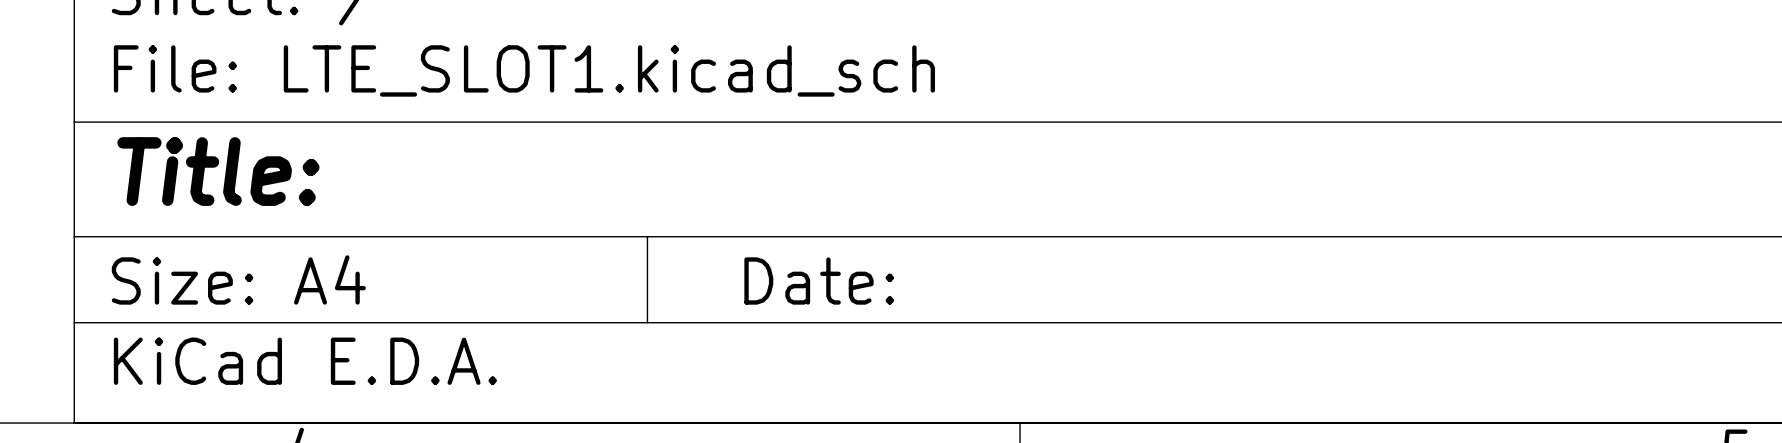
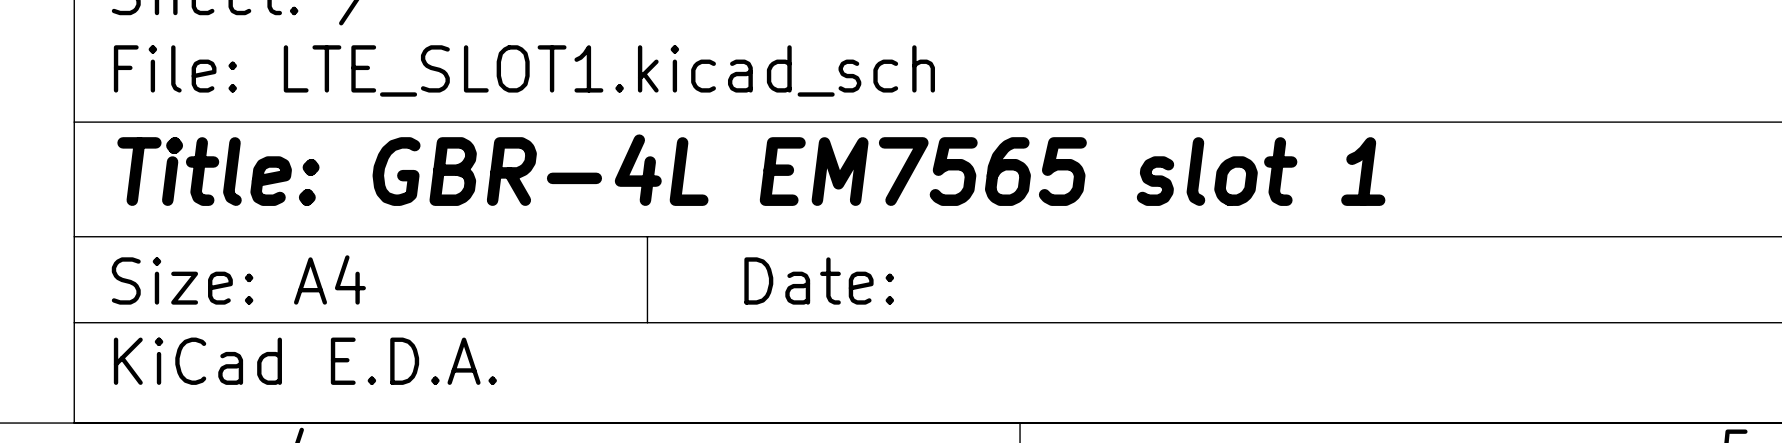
title block: Title: (218, 171) -> Title: GBR-4L EM7565 slot 1 (751, 170)

